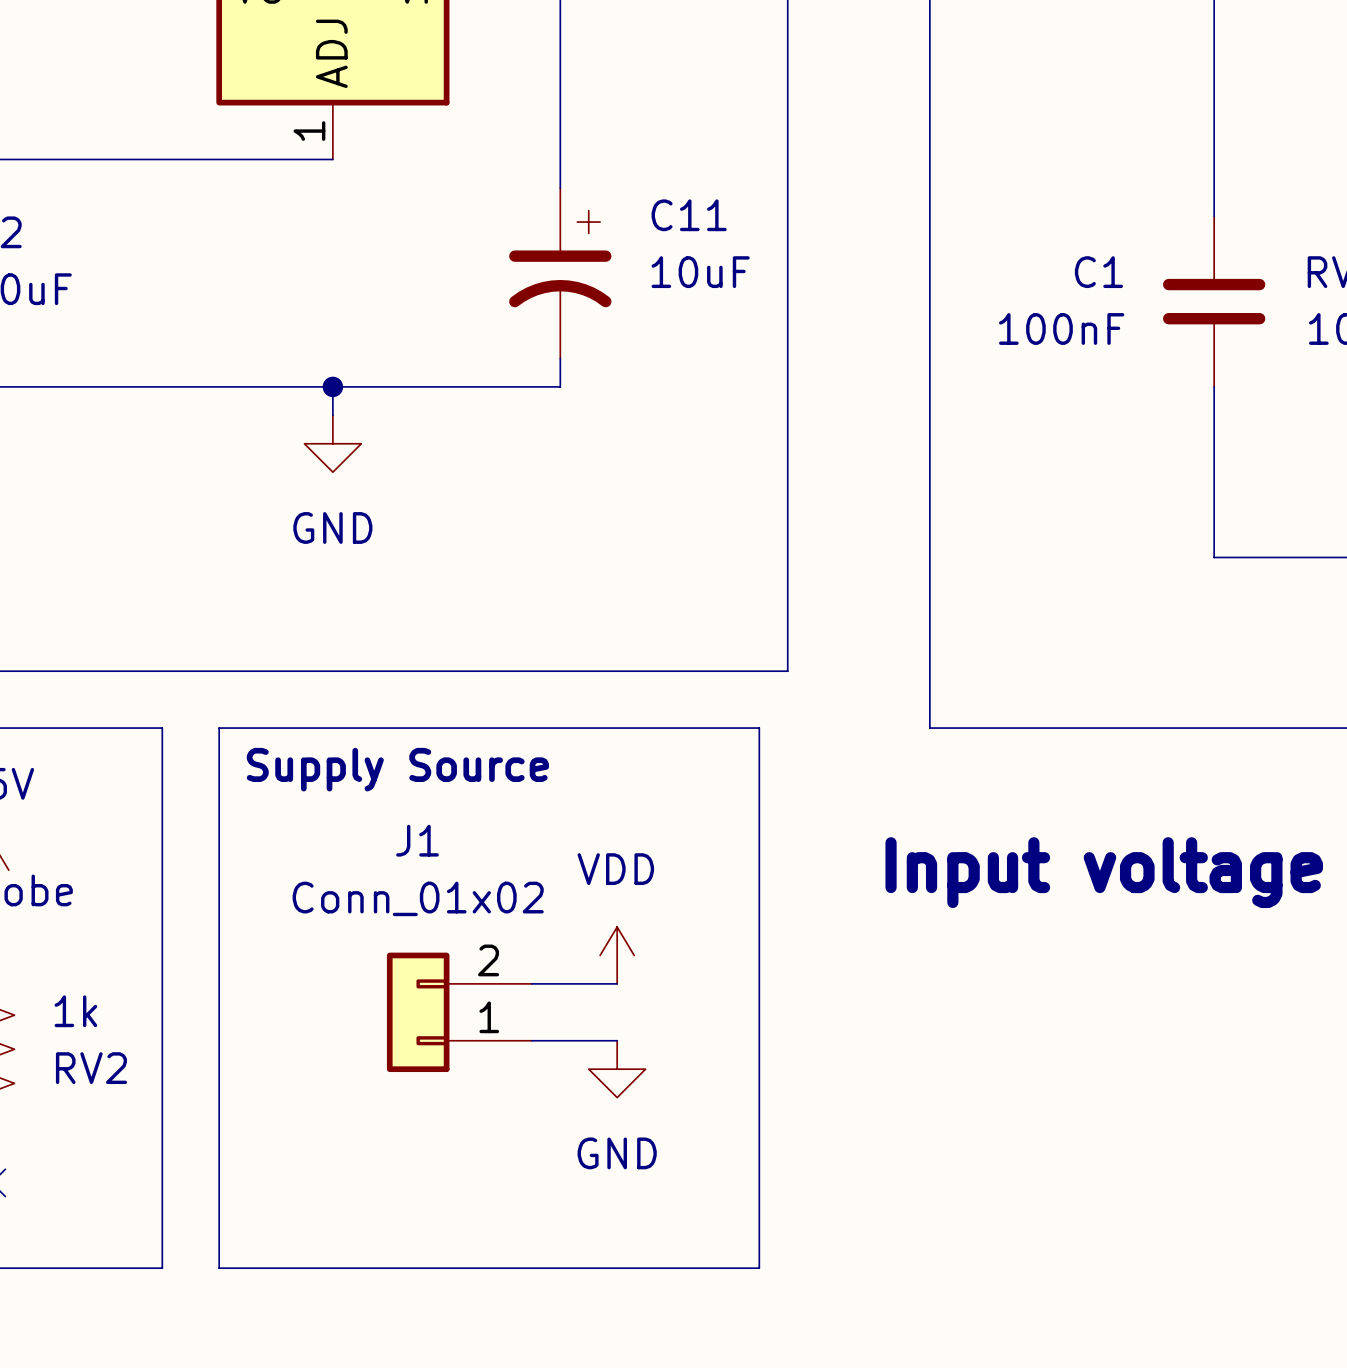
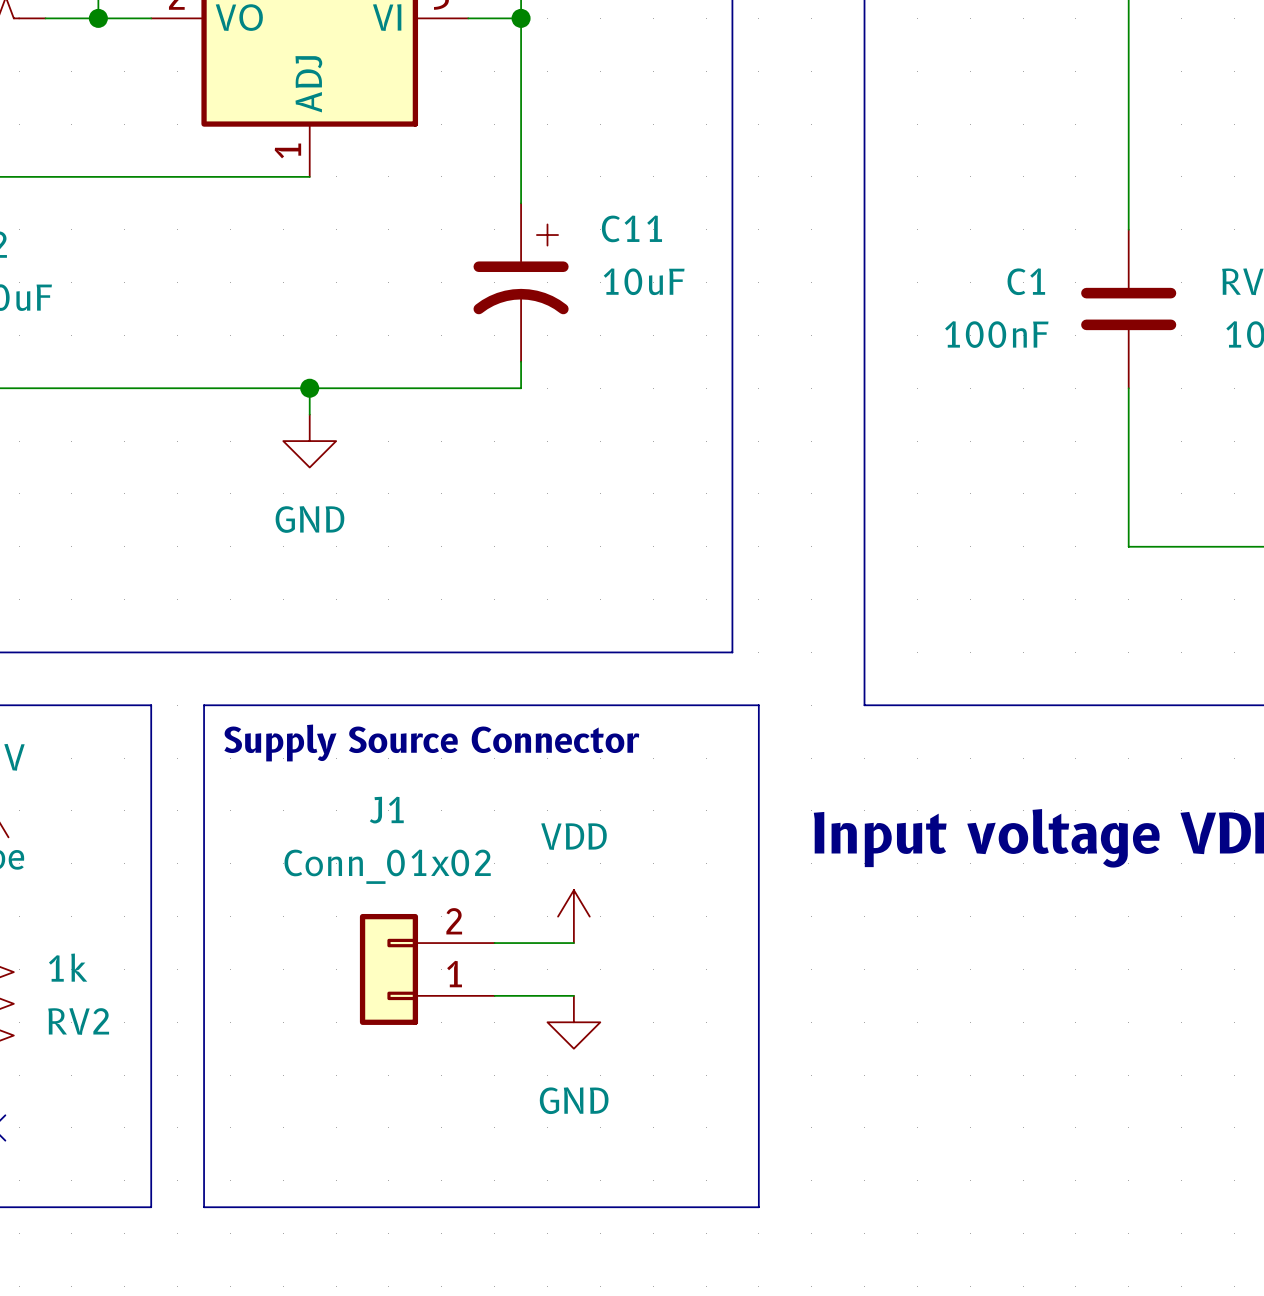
line: (759, 728) (759, 1268) -> (706, 705) (758, 705) (758, 1207) (706, 1207)
text: Supply Source (397, 769) -> Supply Source Connector (431, 742)

